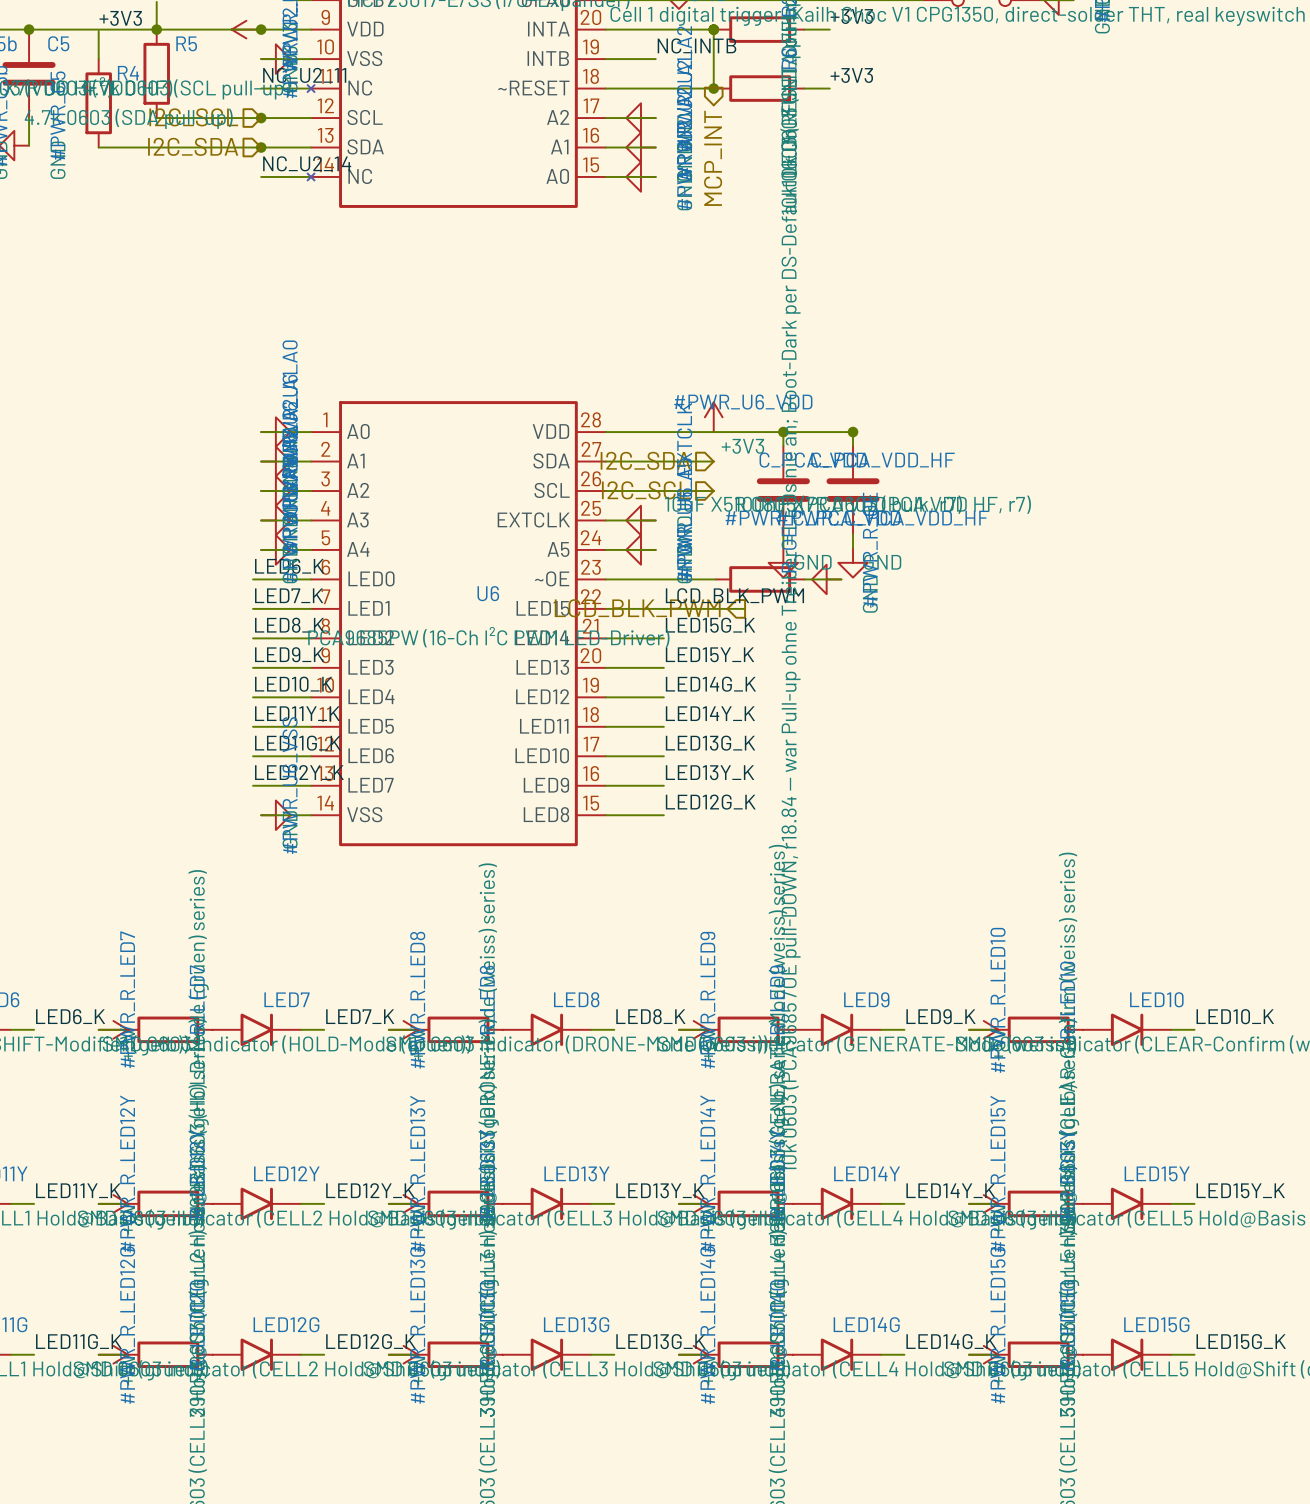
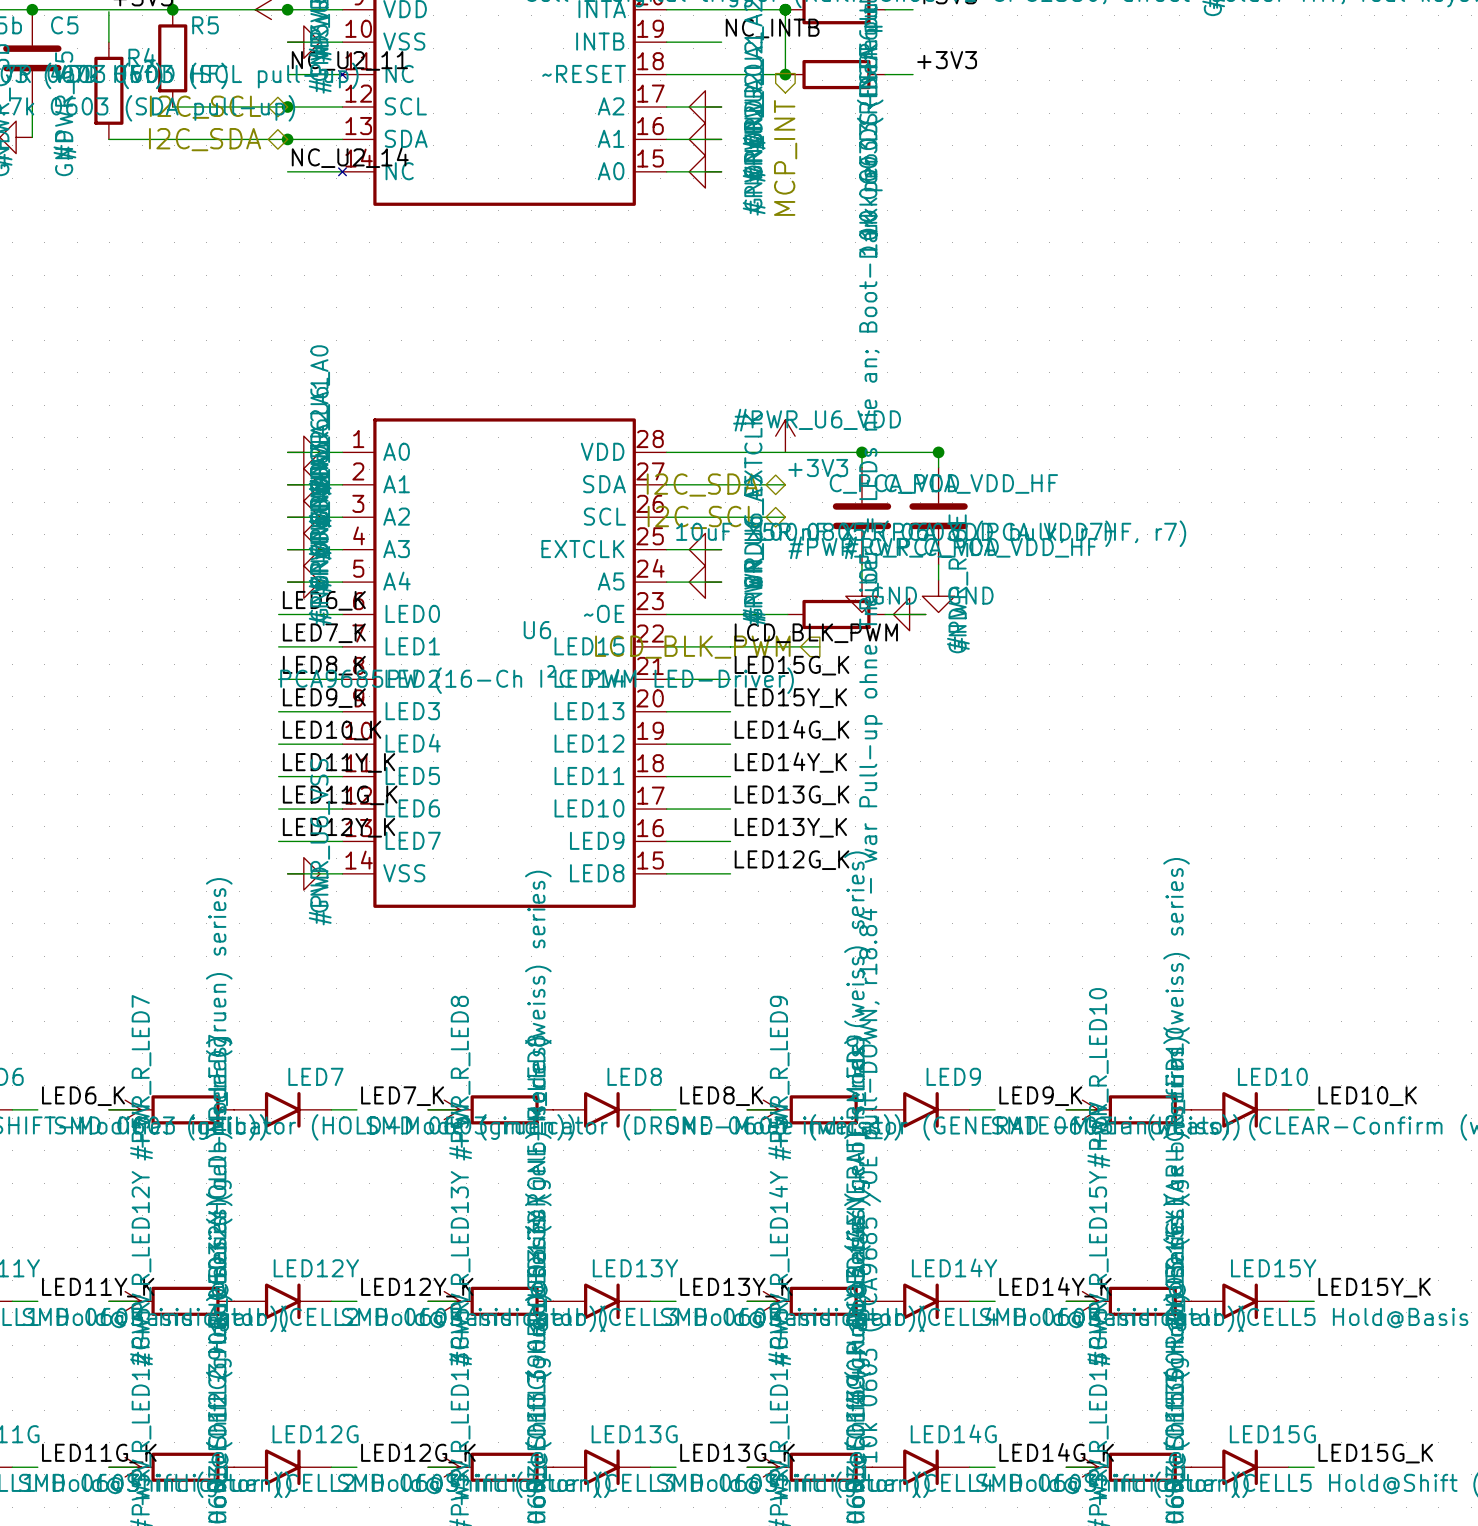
hierarchical label shape: input (193, 117) -> bidirectional (205, 107)
hierarchical label shape: input (193, 146) -> bidirectional (205, 139)
hierarchical label shape: input (645, 460) -> bidirectional (702, 485)
hierarchical label shape: input (646, 490) -> bidirectional (703, 517)

